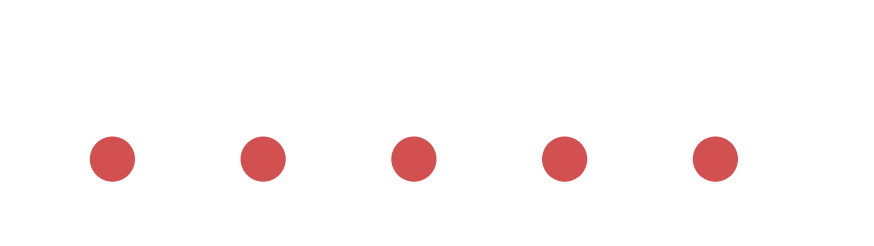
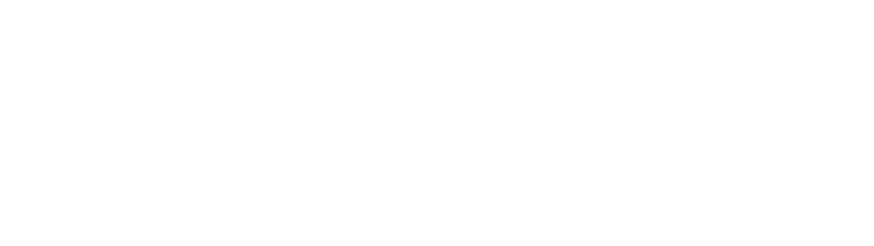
part: (112, 159) -> none
part: (263, 159) -> none
part: (413, 159) -> none
part: (564, 159) -> none
part: (715, 159) -> none

